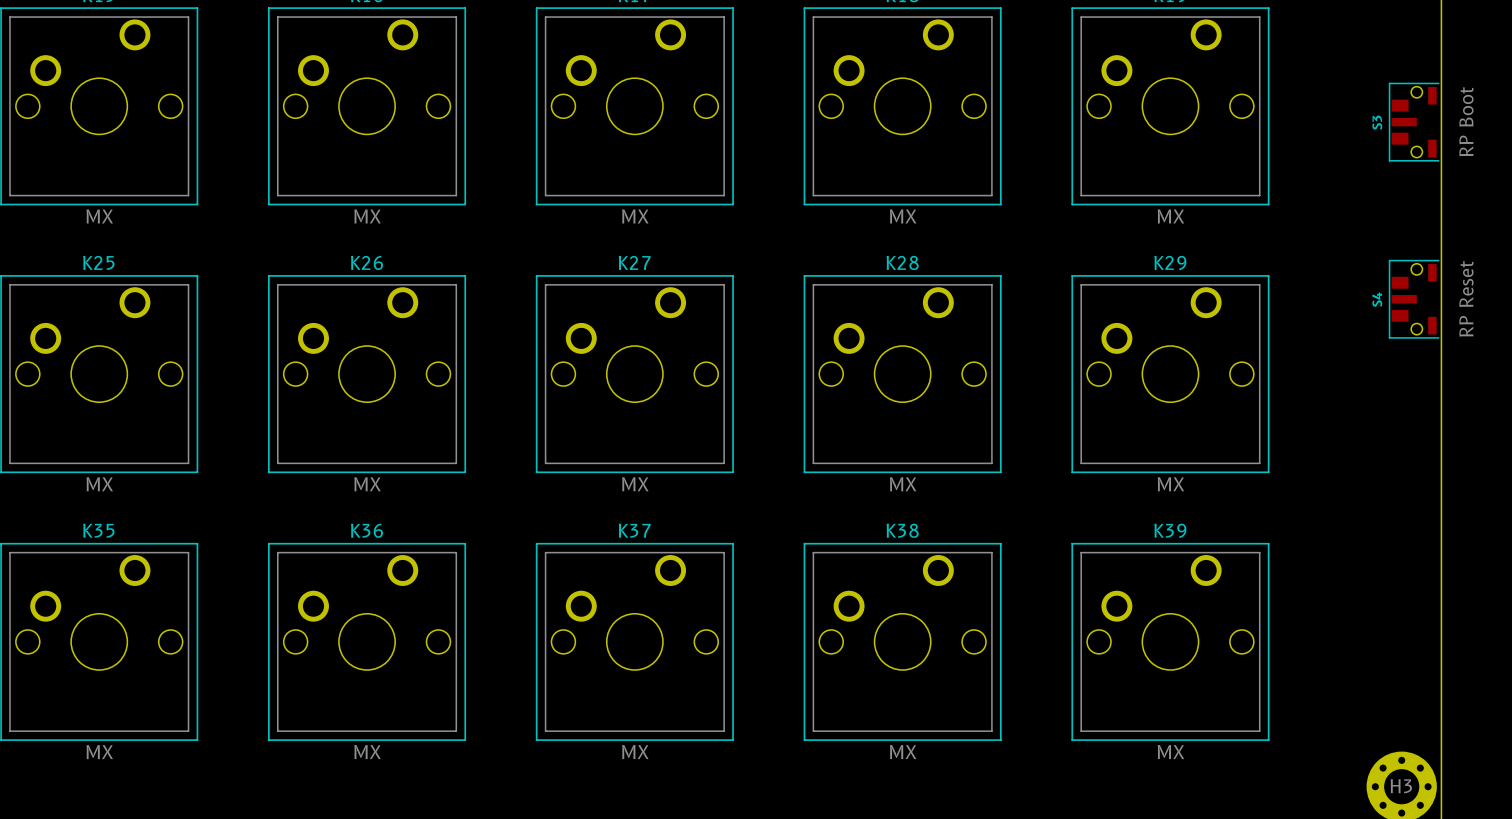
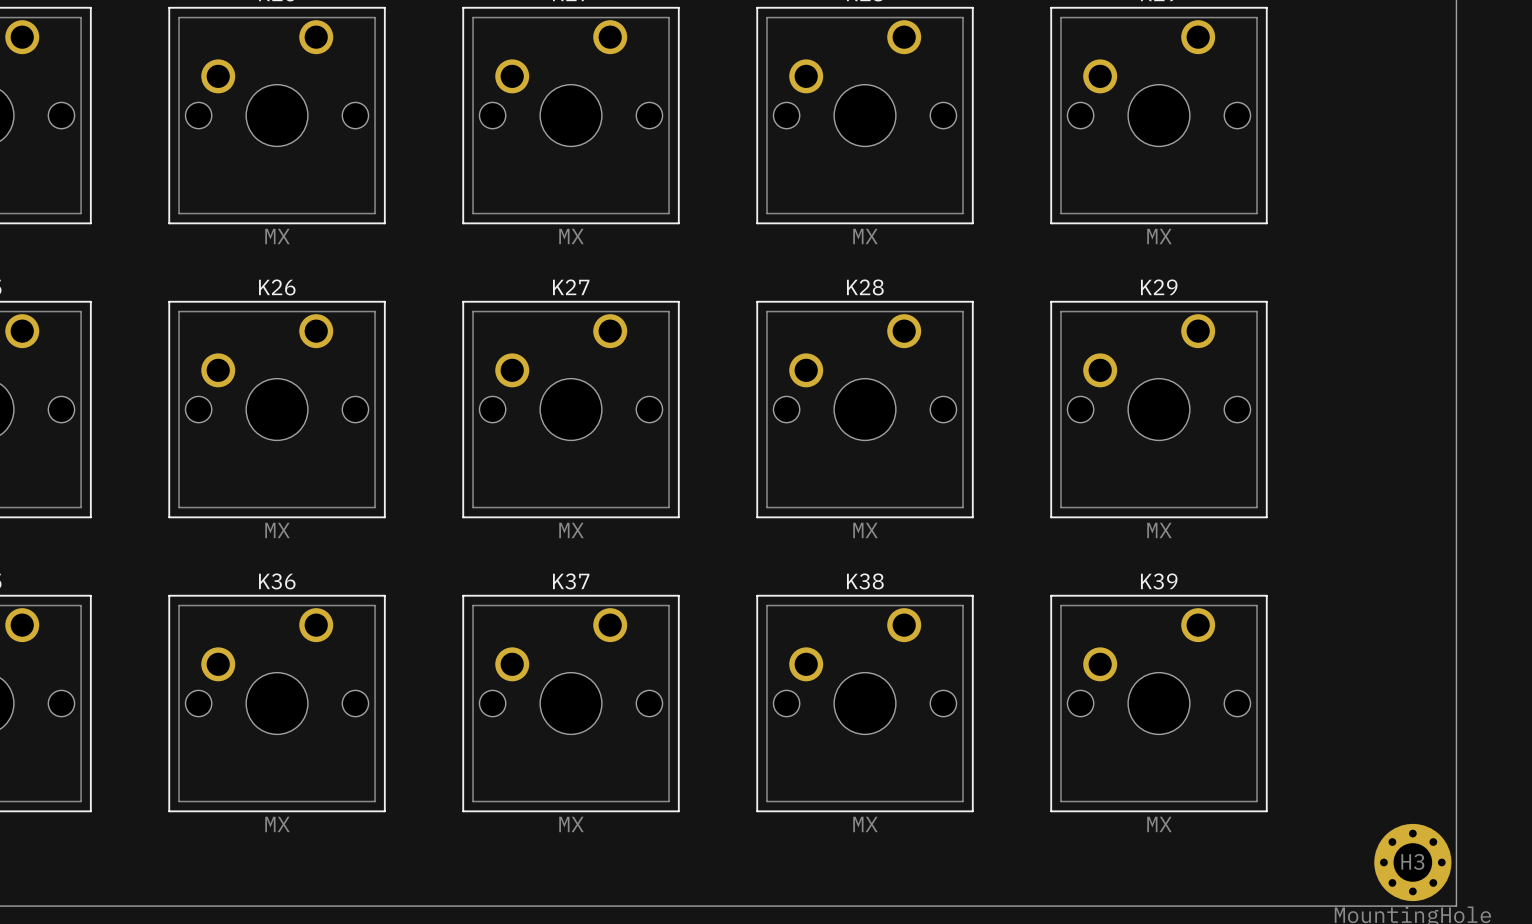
S3: RP Boot (1414, 122) -> none
S4: RP Reset (1414, 299) -> none

